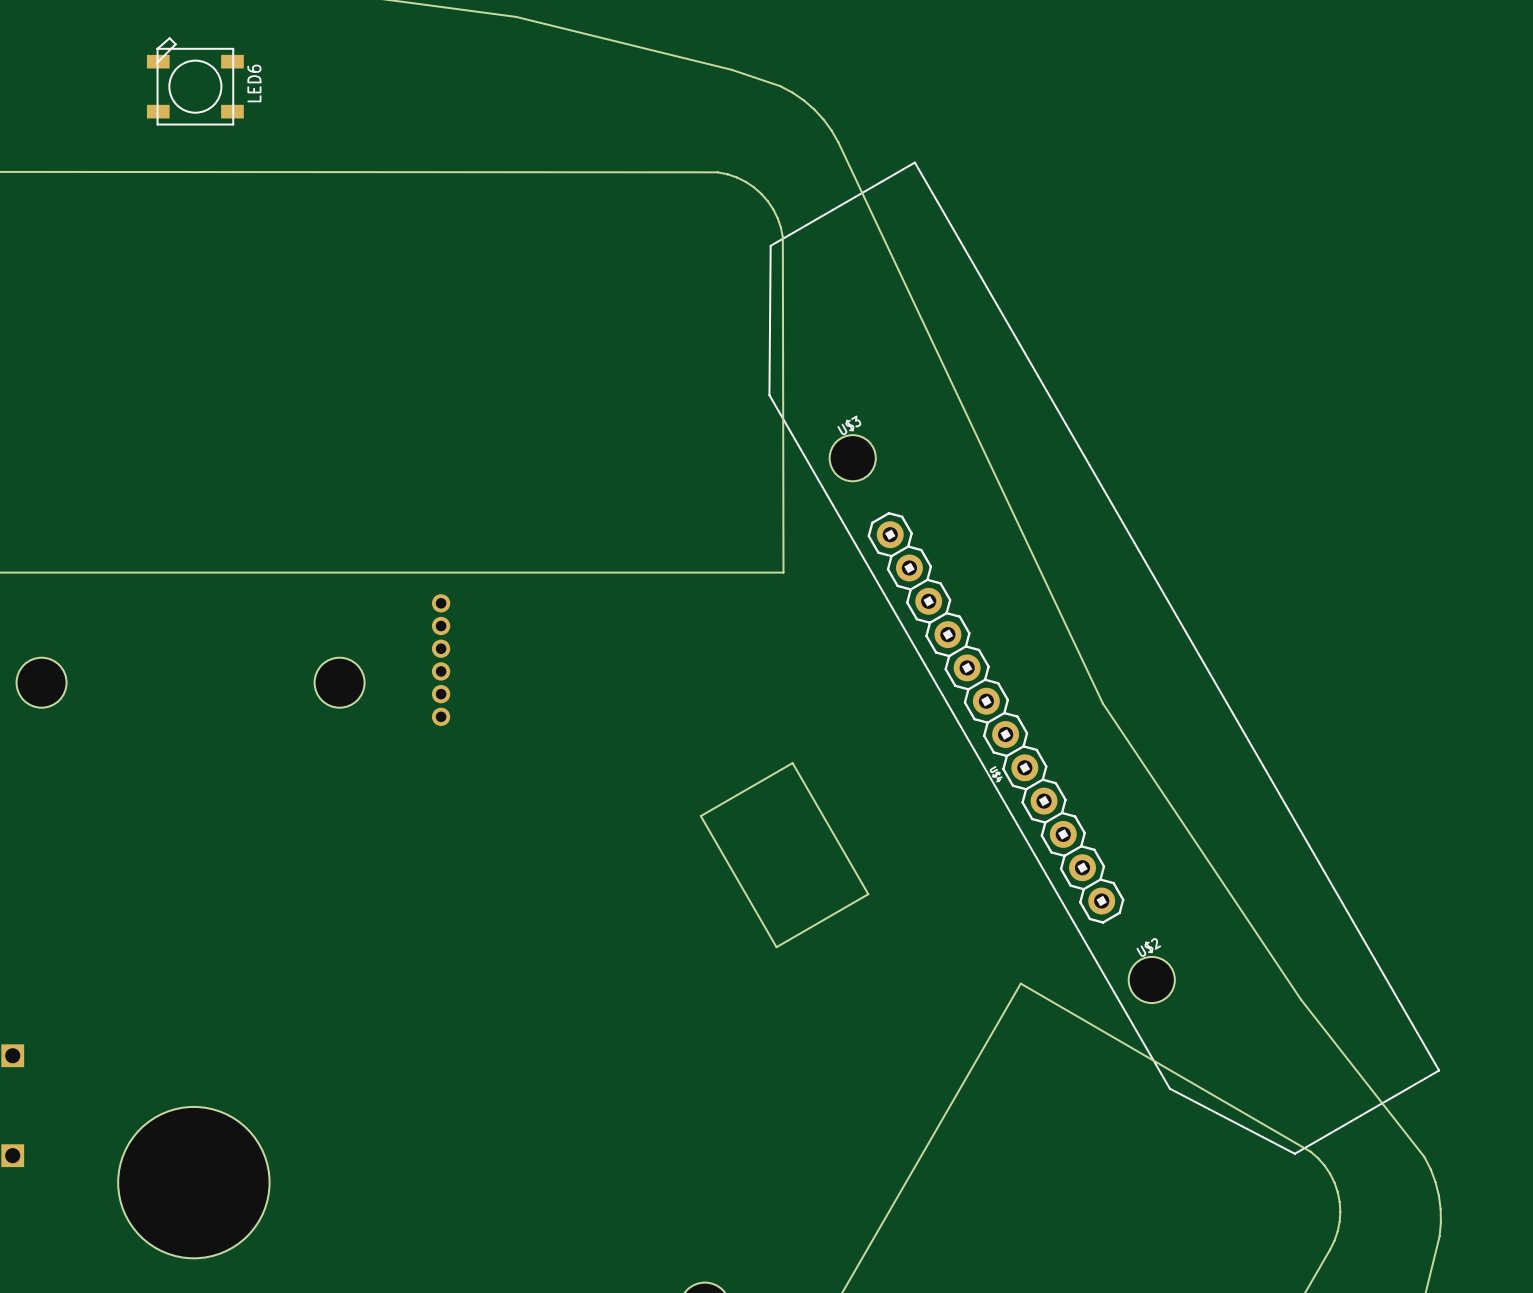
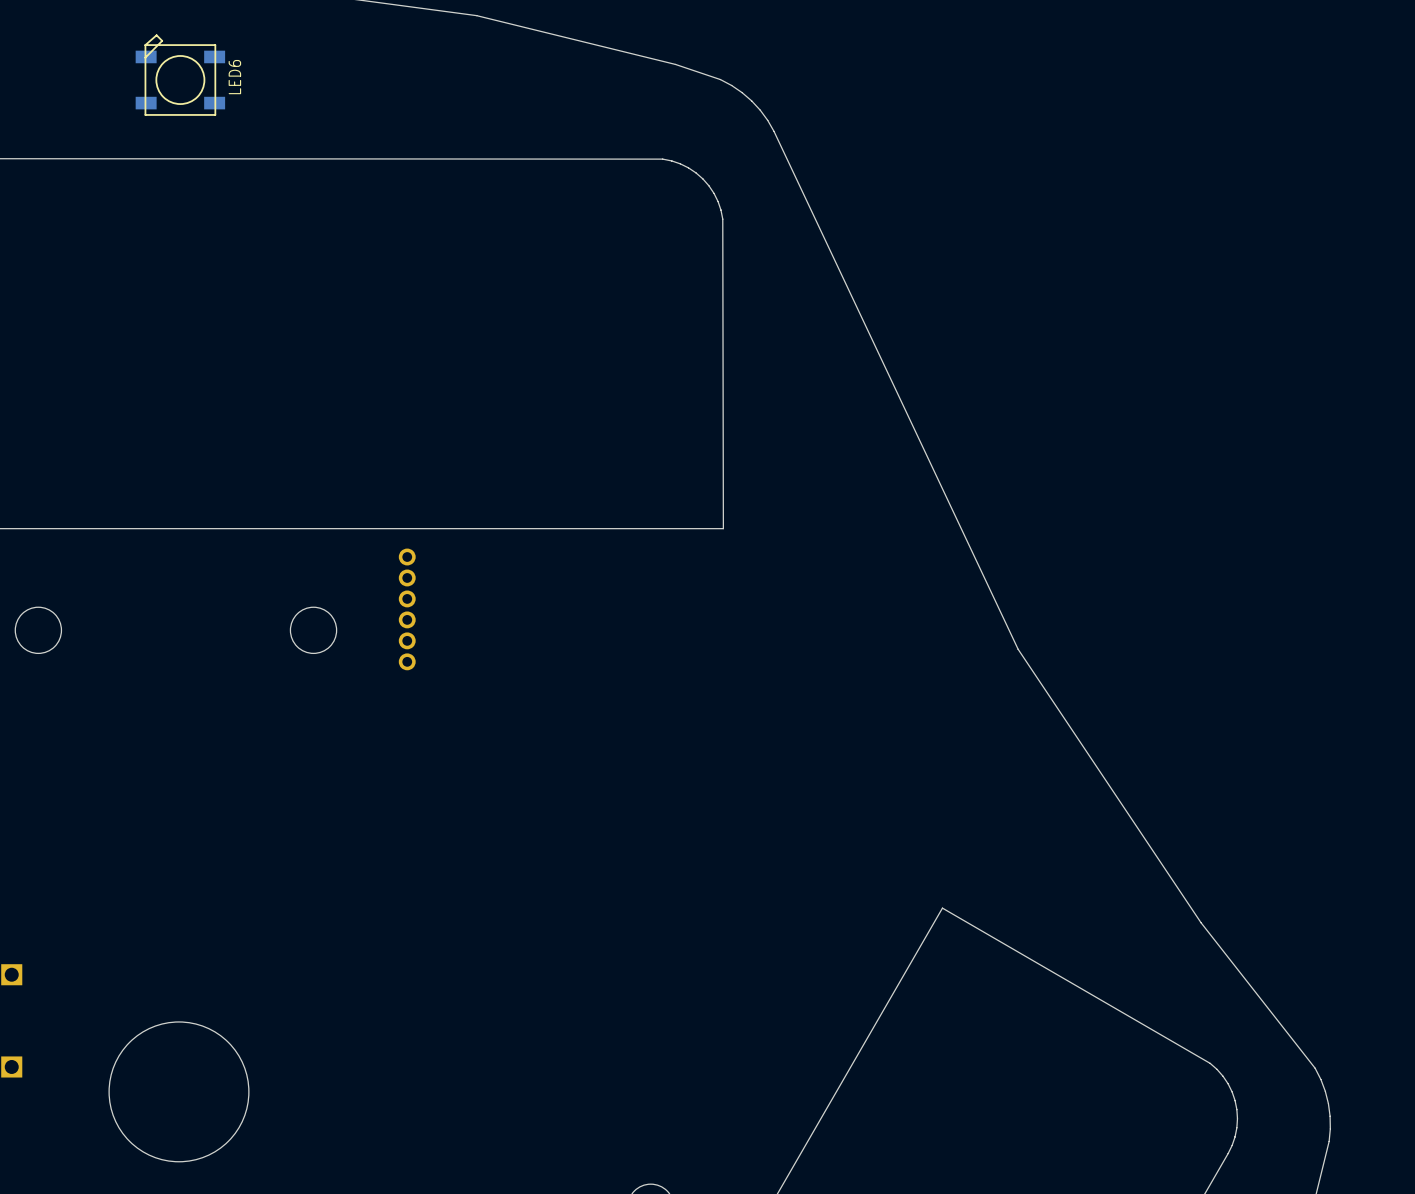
part: (1104, 658) -> none
part: (784, 855) -> none

